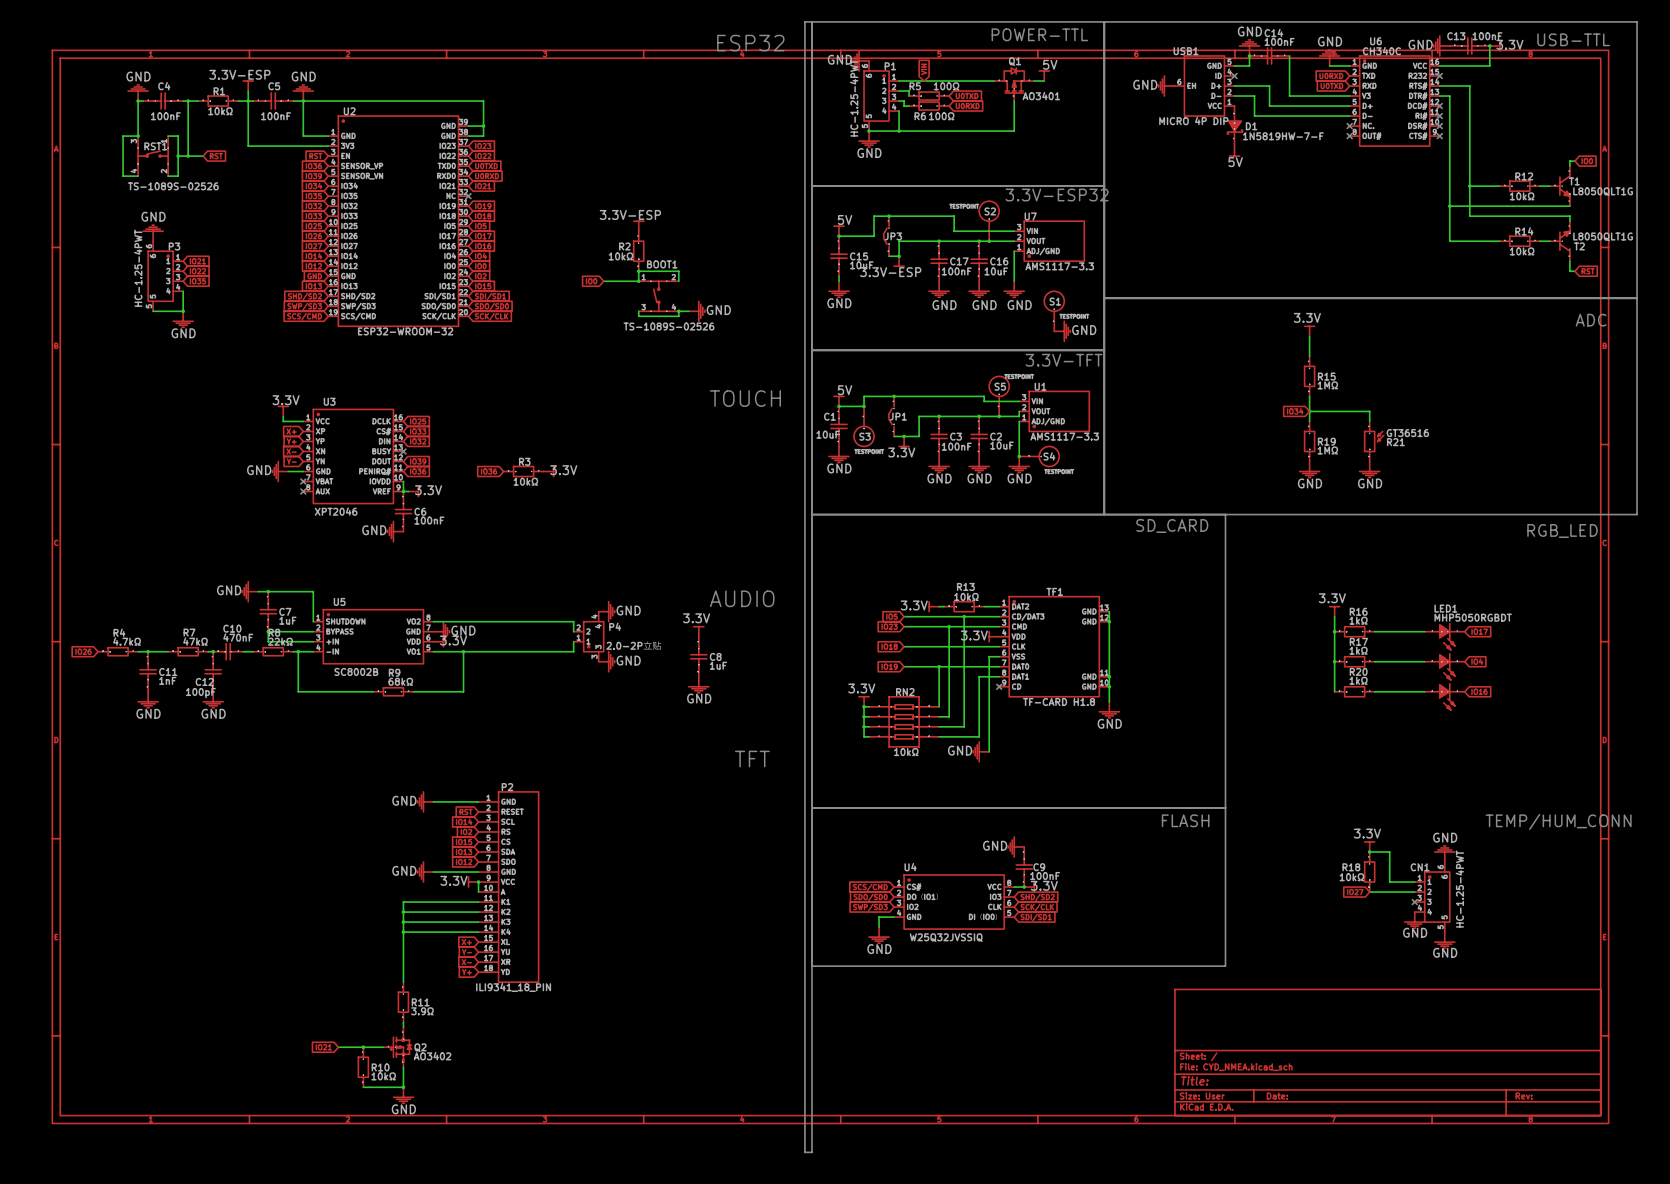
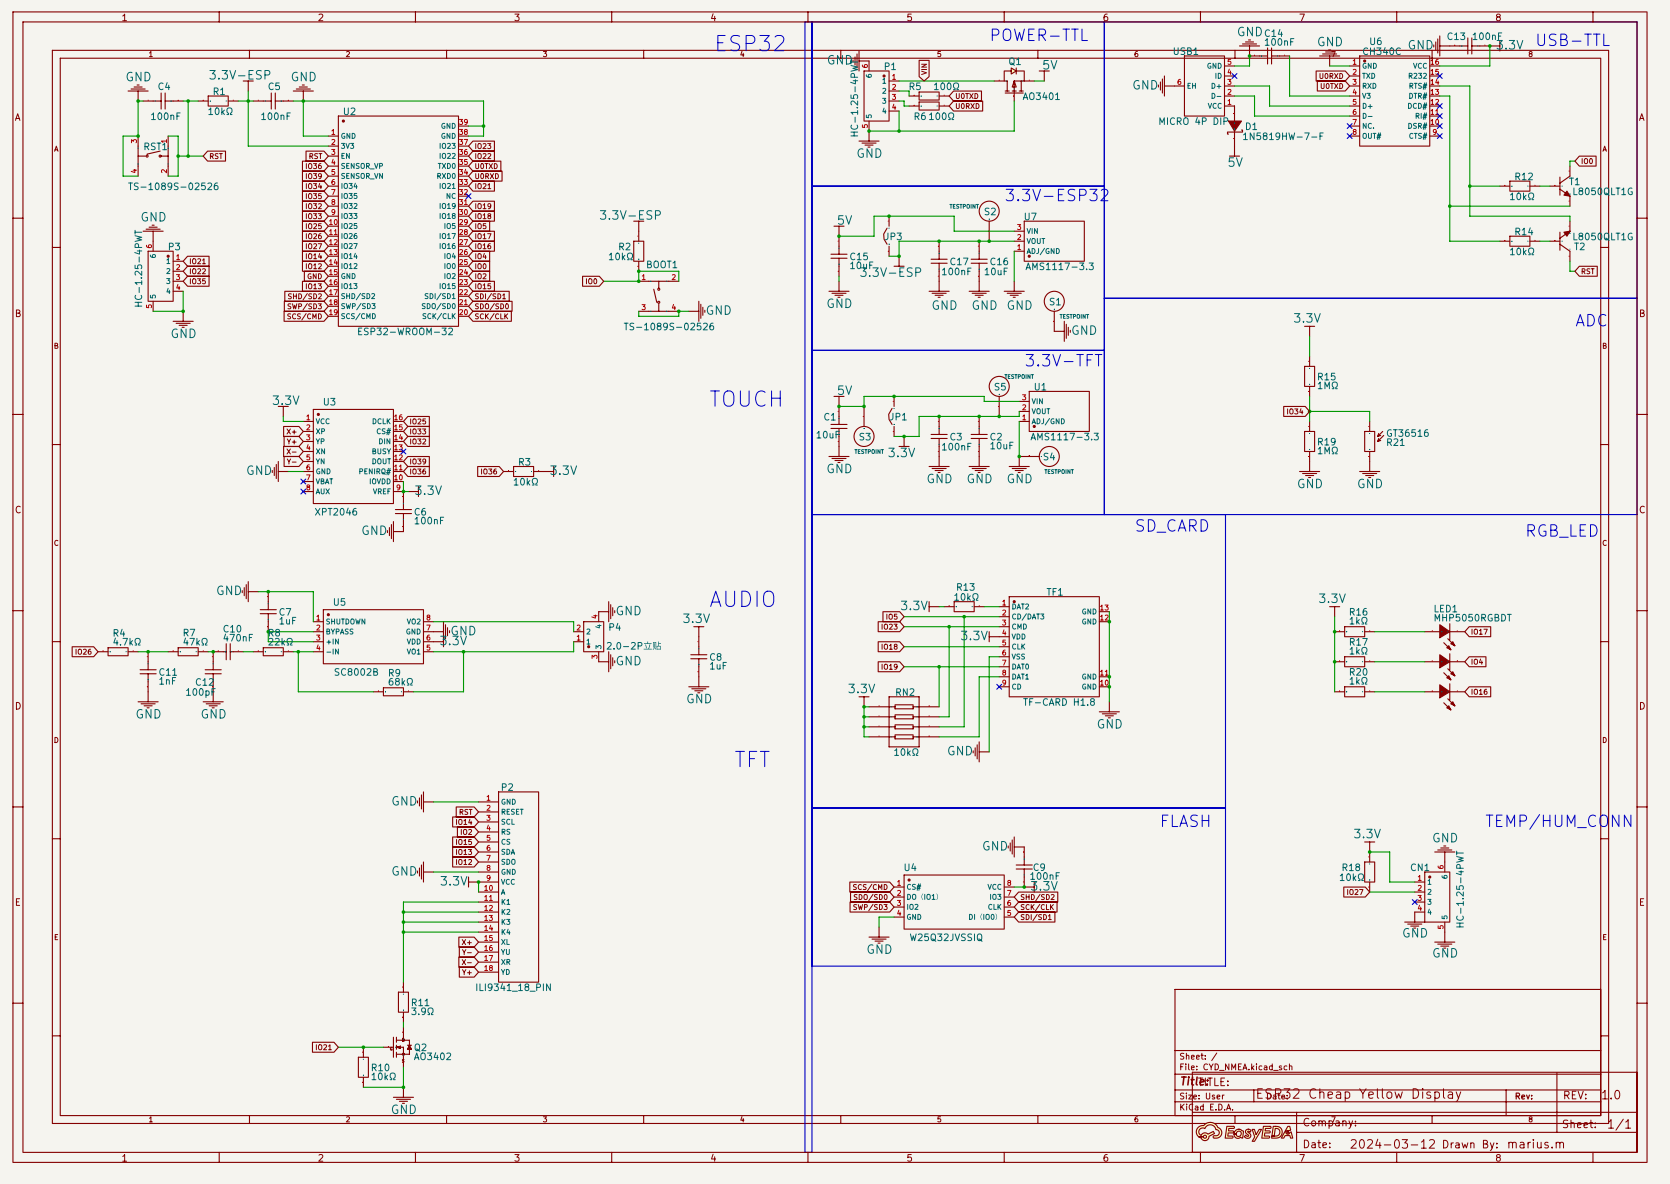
part: none -> (829, 587)

